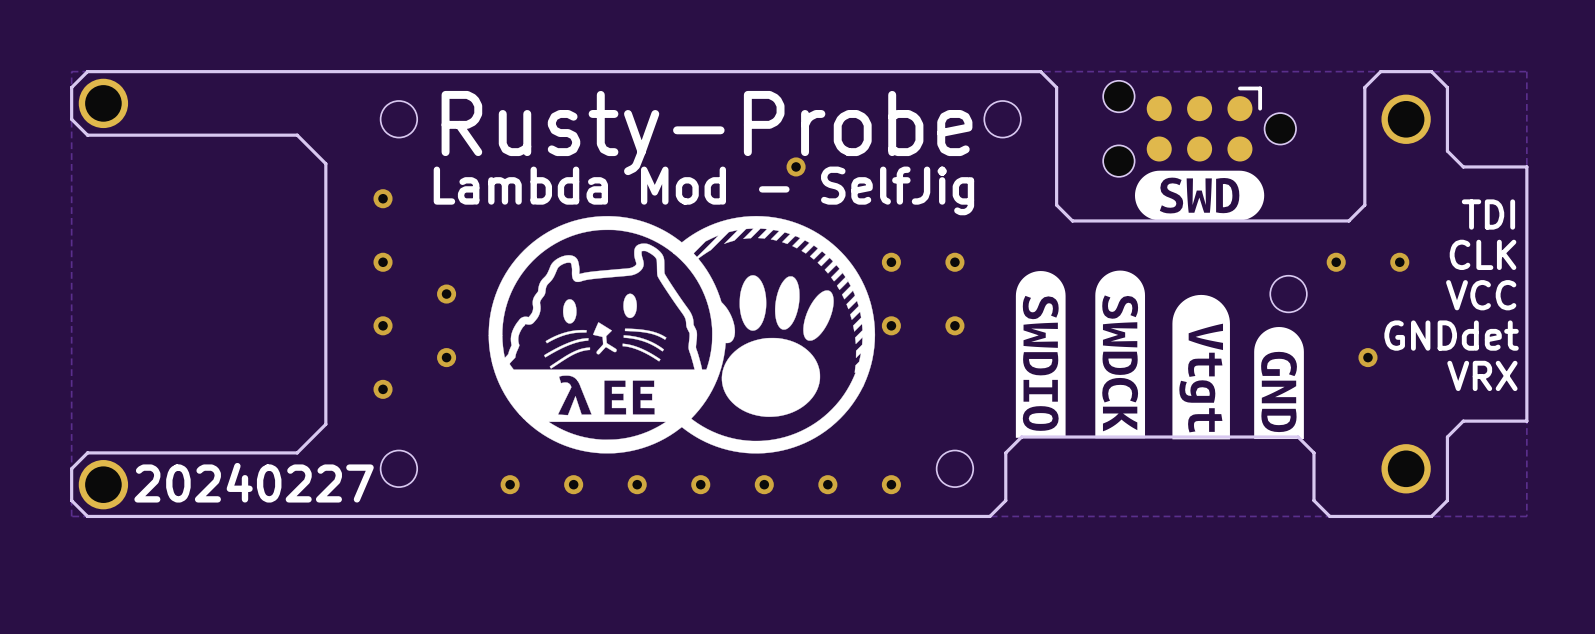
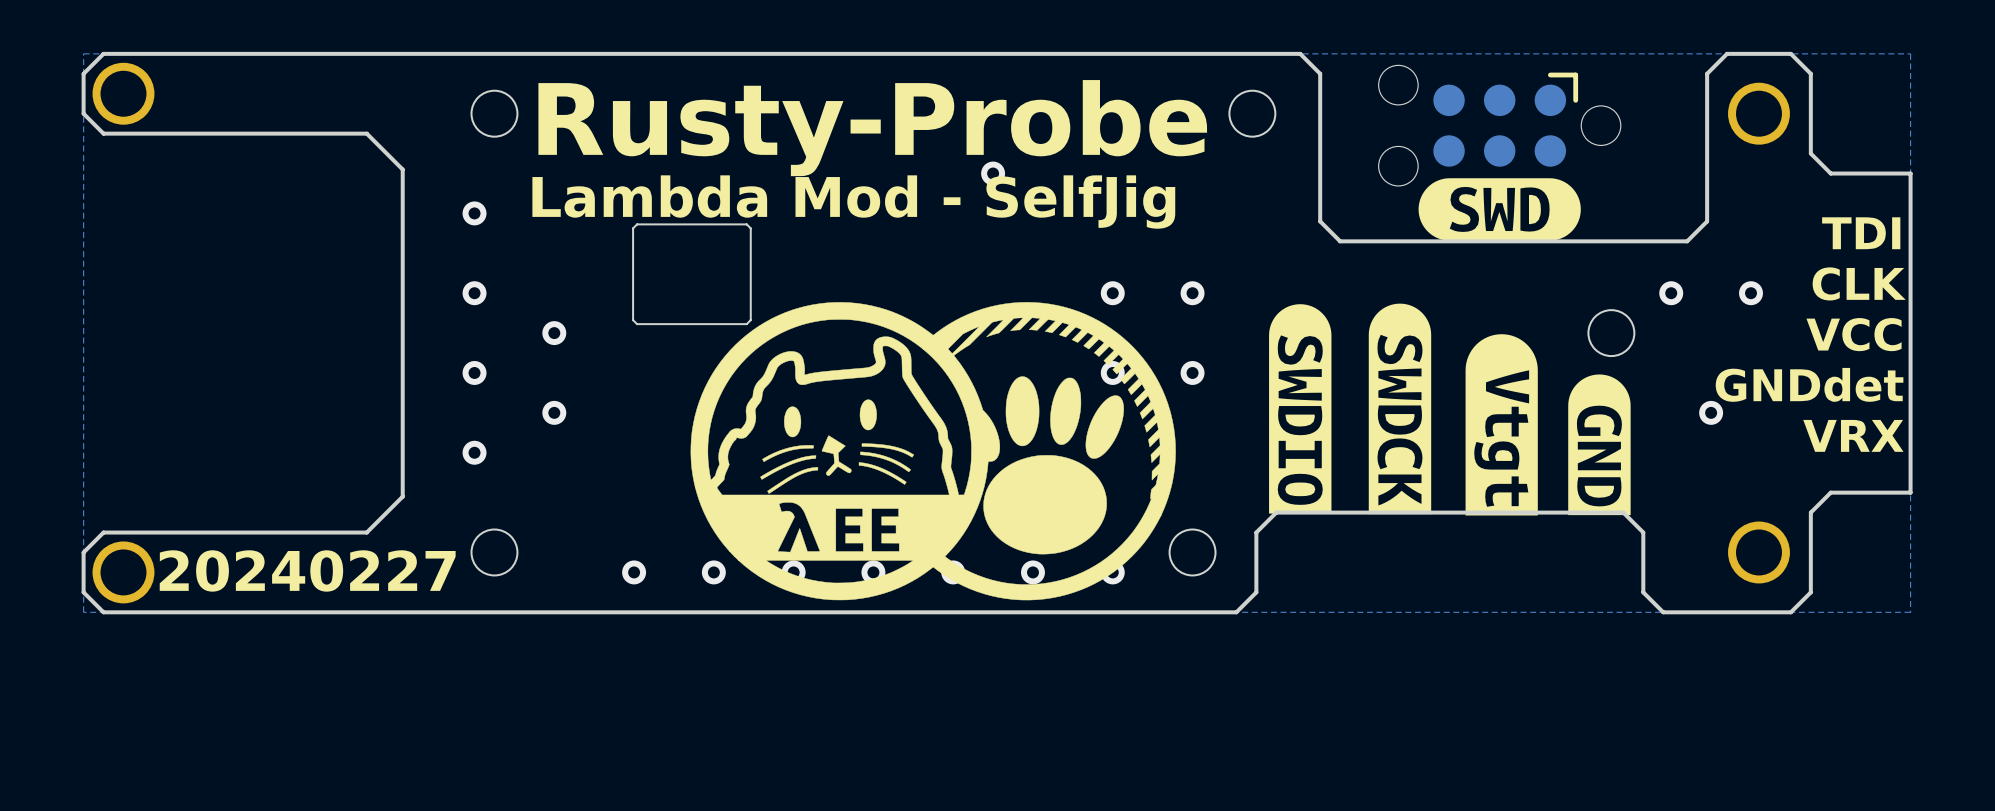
board edge: none -> (746, 224) (750, 228) (750, 320) (746, 324) (637, 324) (633, 320) (633, 228) (637, 224) (746, 224)
drawing position: (681, 334) -> (933, 451)

